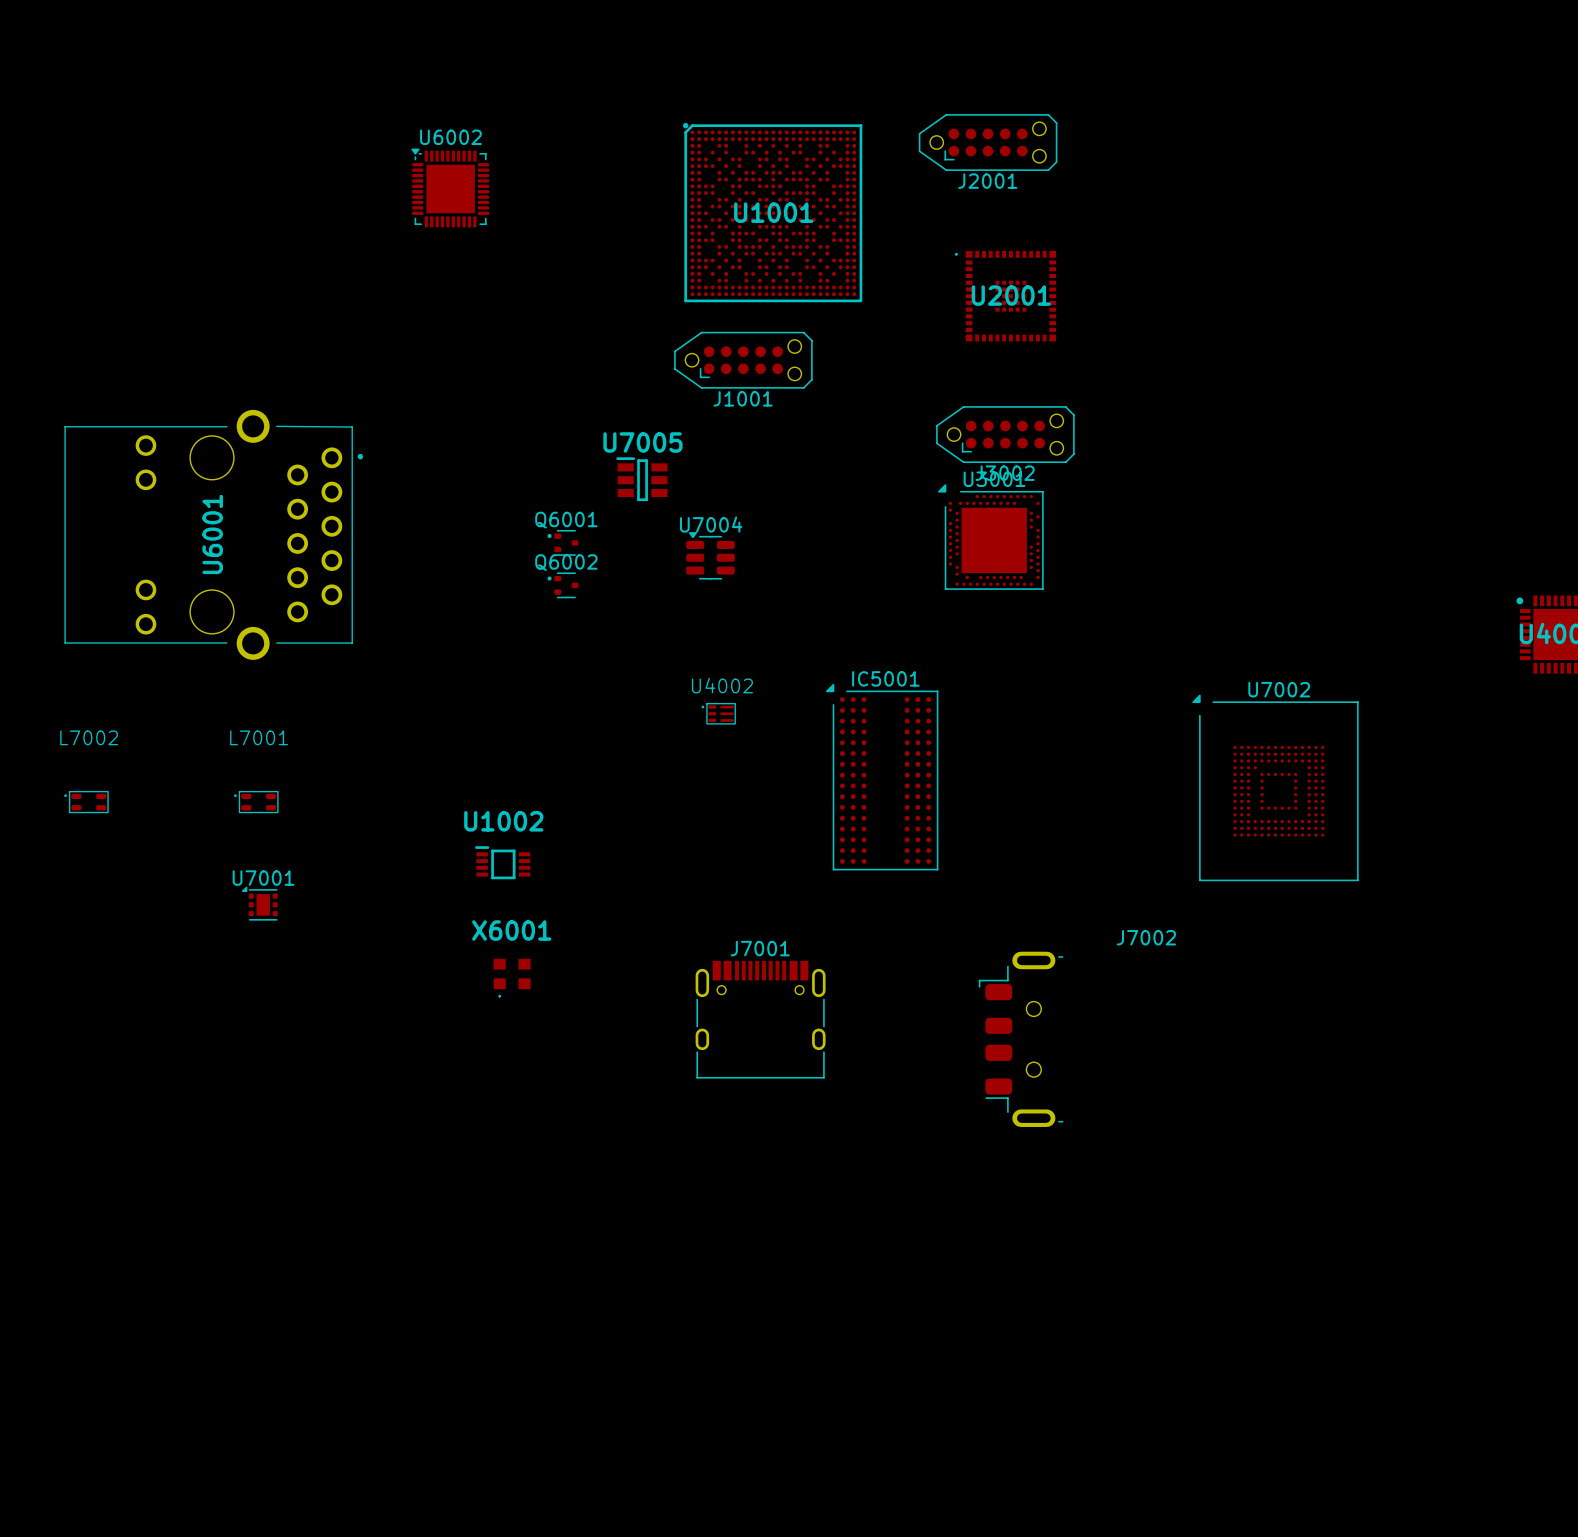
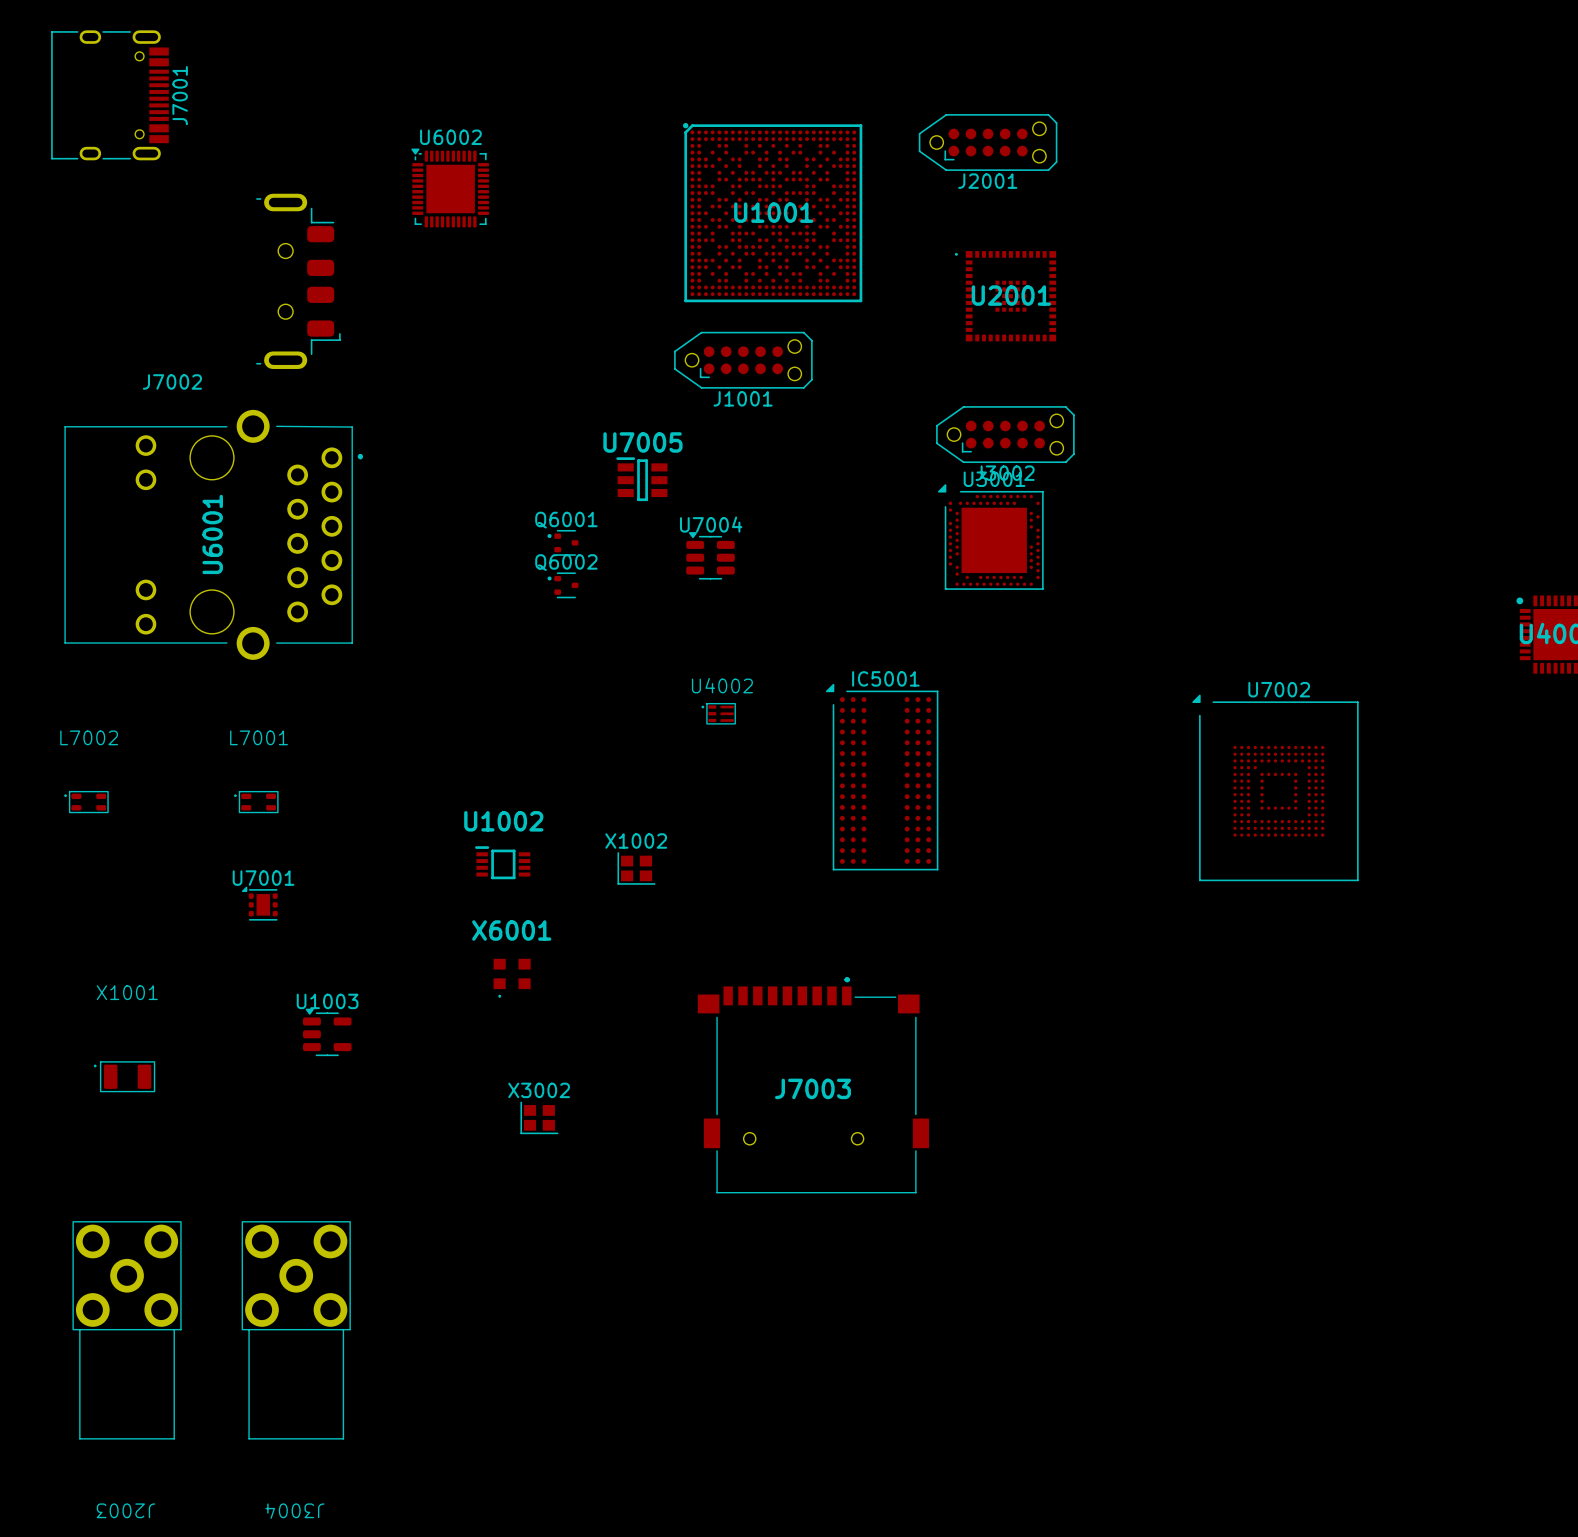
X1002: none -> (636, 868)
J7001 rotation: 0° (760, 1019) -> 90° clockwise (109, 95)
J7001 position: (760, 1019) -> (109, 95)
U1003: none -> (327, 1032)
J7002 rotation: 0° (1021, 1039) -> 180° (298, 281)
J7002 position: (1021, 1039) -> (298, 281)
X1001: none -> (124, 1076)
J7003: none -> (813, 1085)
X3002: none -> (539, 1117)
J2003: none -> (127, 1330)
J3004: none -> (296, 1330)

